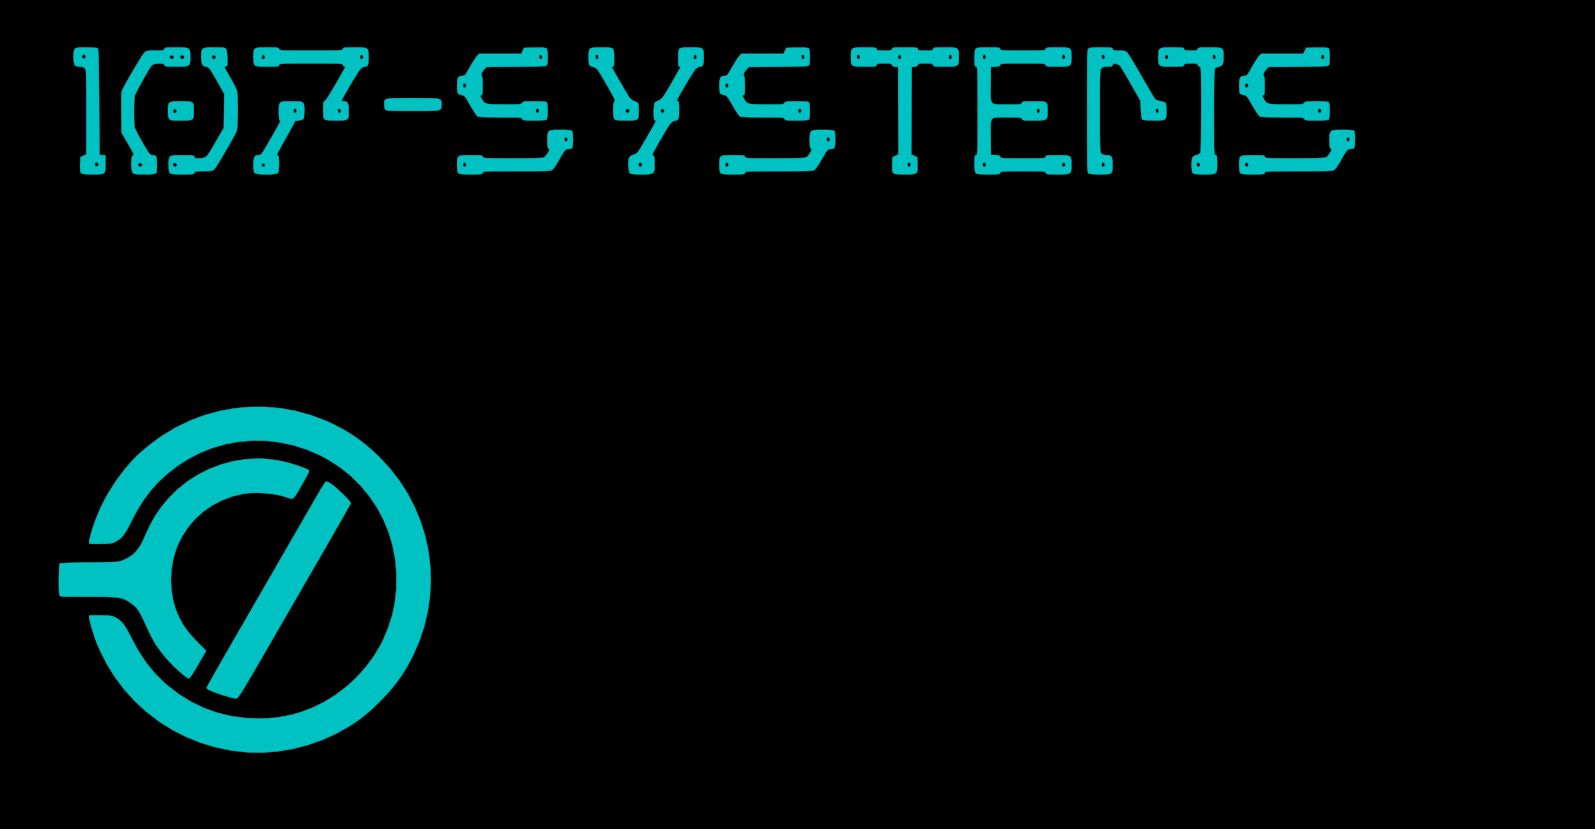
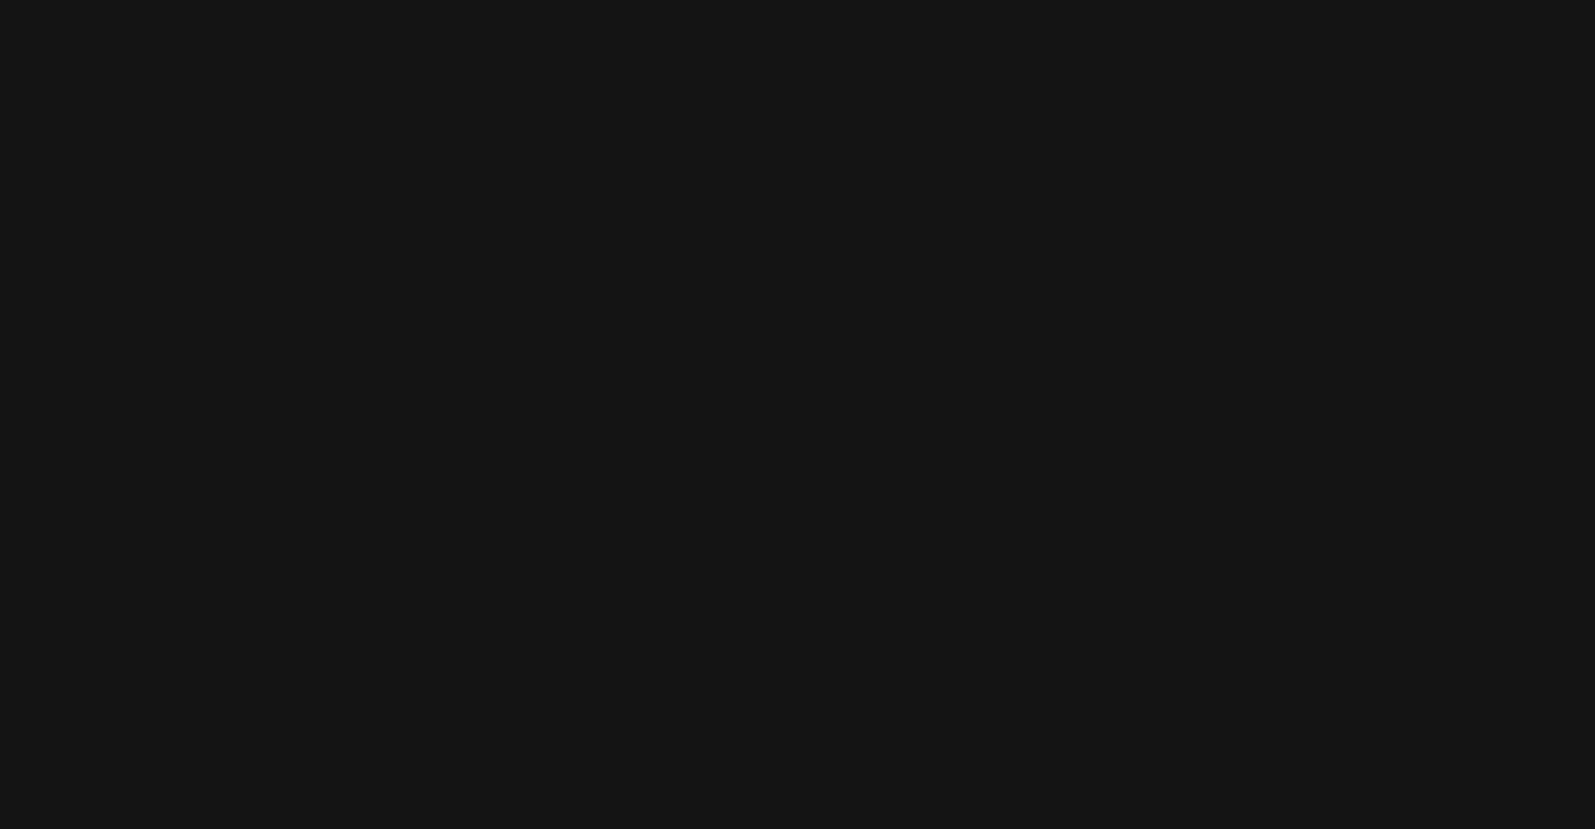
drawing: [73, 47, 1356, 175] -> none
drawing: [58, 406, 431, 753] -> none

